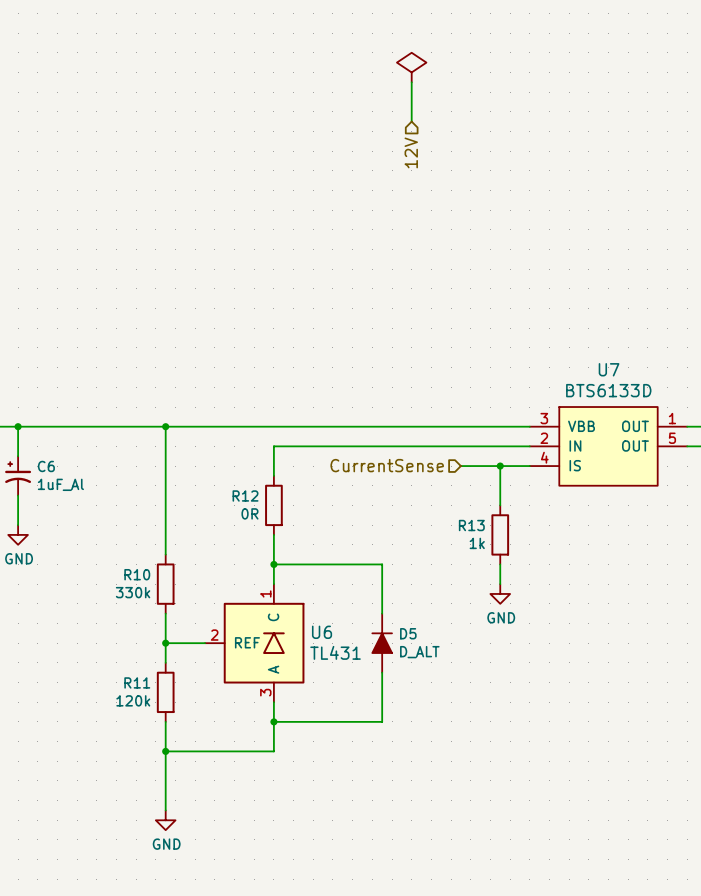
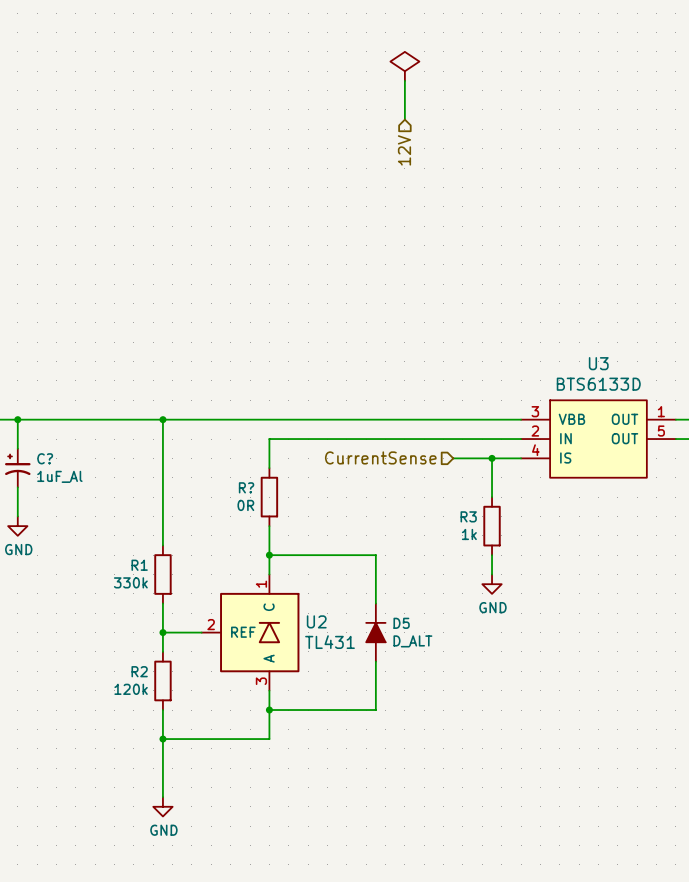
U7 name: U7 (609, 369) -> U3 (598, 363)
C6 name: C6 (46, 466) -> C? (45, 458)
R12 name: R12 (245, 495) -> R? (246, 487)
R13 name: R13 (471, 525) -> R3 (468, 516)
R10 name: R10 (137, 574) -> R1 (139, 565)
U6 name: U6 (322, 632) -> U2 (316, 621)
R11 name: R11 (137, 682) -> R2 (139, 671)

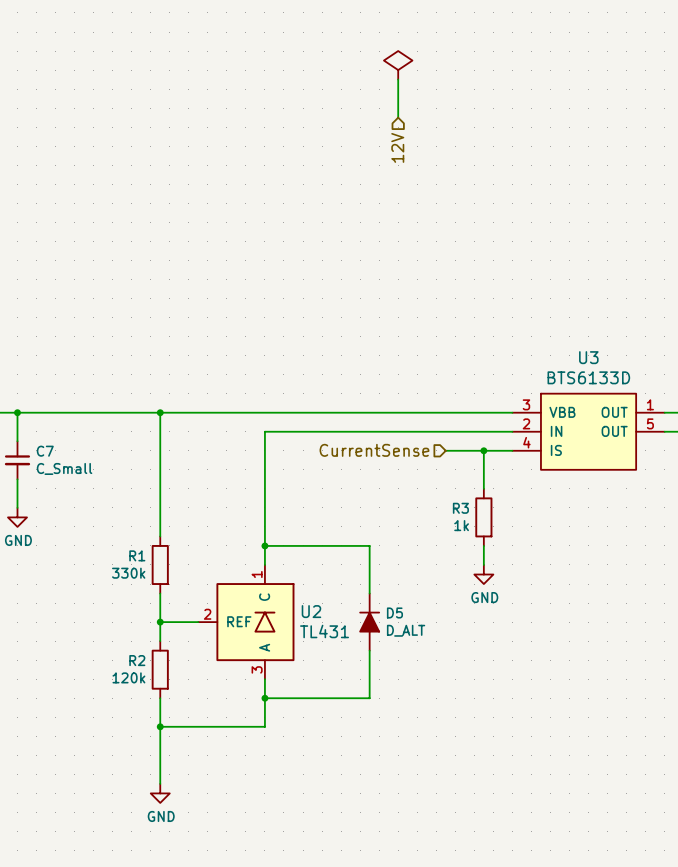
C?: 1uF_Al (17, 468) -> none
C7: none -> C_Small (17, 460)
wire: none -> (264, 460) (264, 517)
R?: 0R (269, 497) -> none

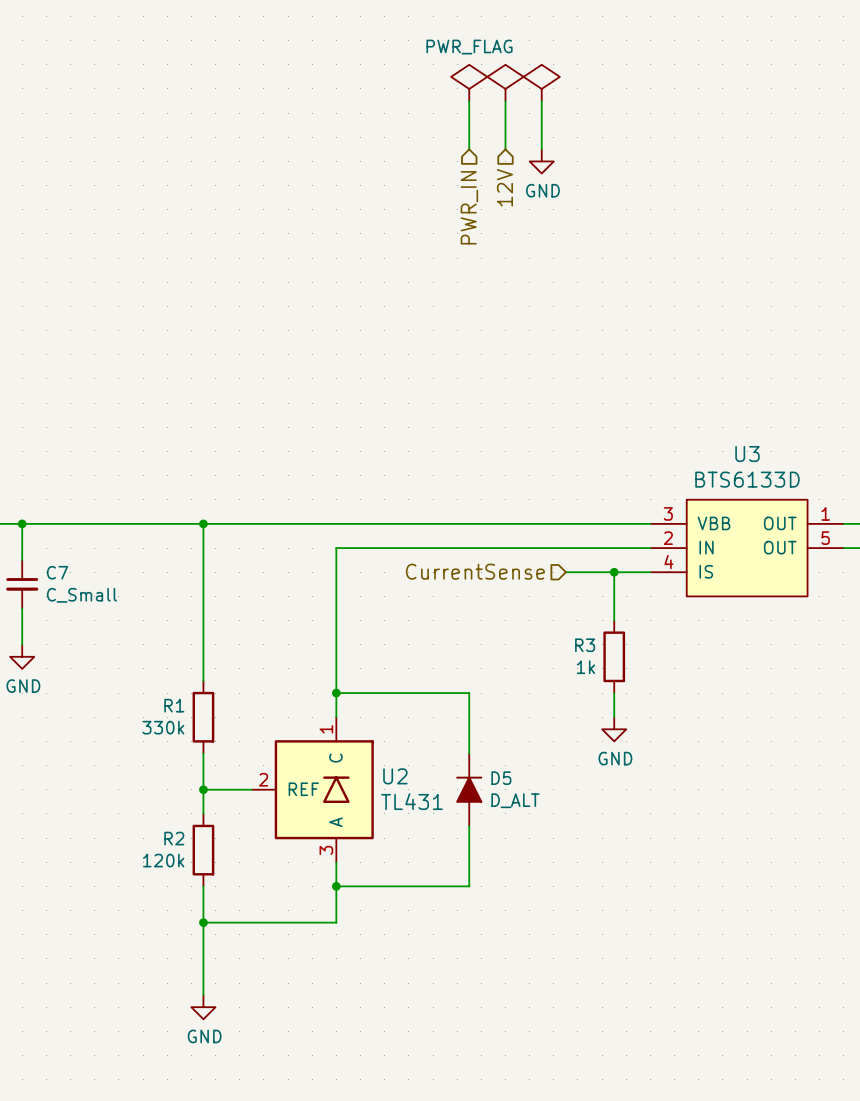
power symbol: none -> PWR_FLAG (469, 82)
power symbol: none -> (541, 82)
wire: none -> (469, 101) (469, 149)
wire: none -> (541, 101) (541, 149)
power symbol: none -> GND (541, 161)
hierarchical label: none -> PWR_IN (469, 207)

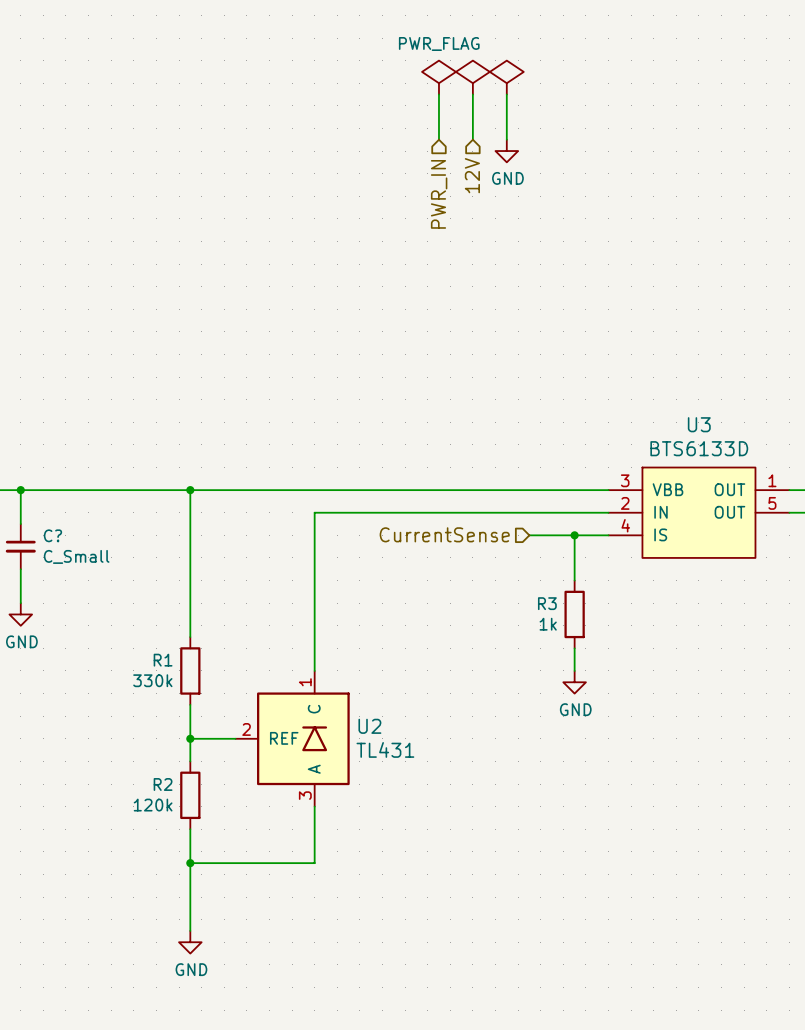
C7 name: C7 (57, 572) -> C? (52, 535)
wire: (336, 693) (469, 693) (469, 753) -> none
junction: (336, 693) -> none
D5: D_ALT (469, 789) -> none
wire: (469, 825) (469, 886) (336, 886) -> none
junction: (336, 886) -> none

